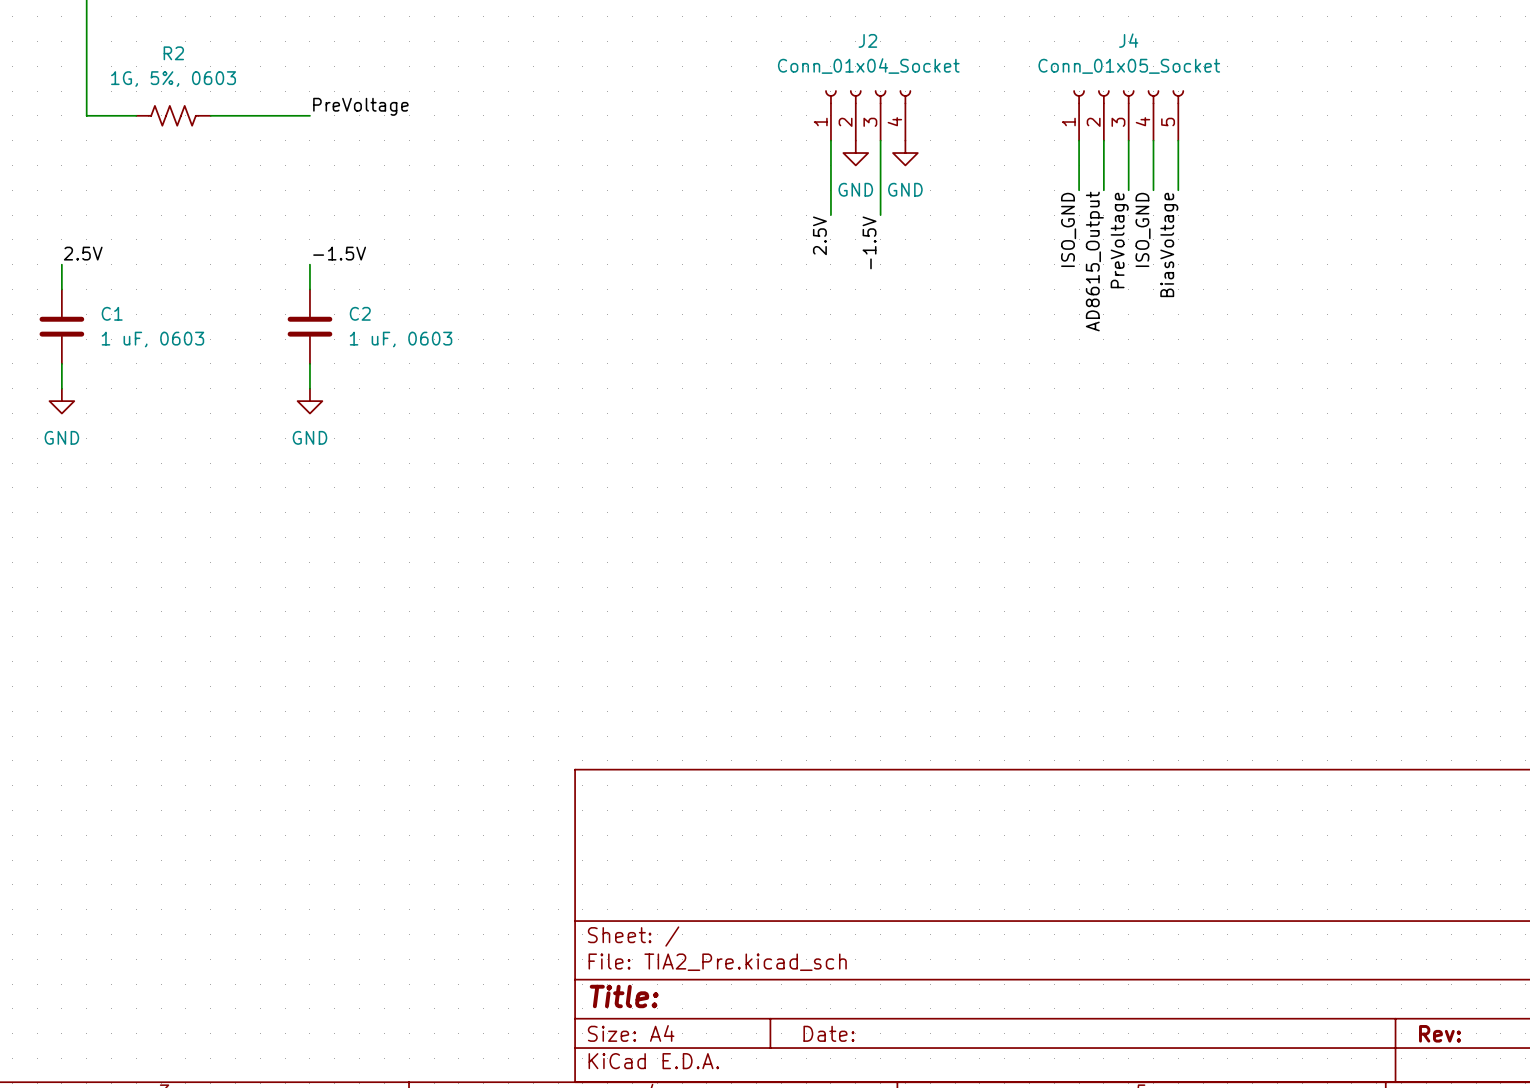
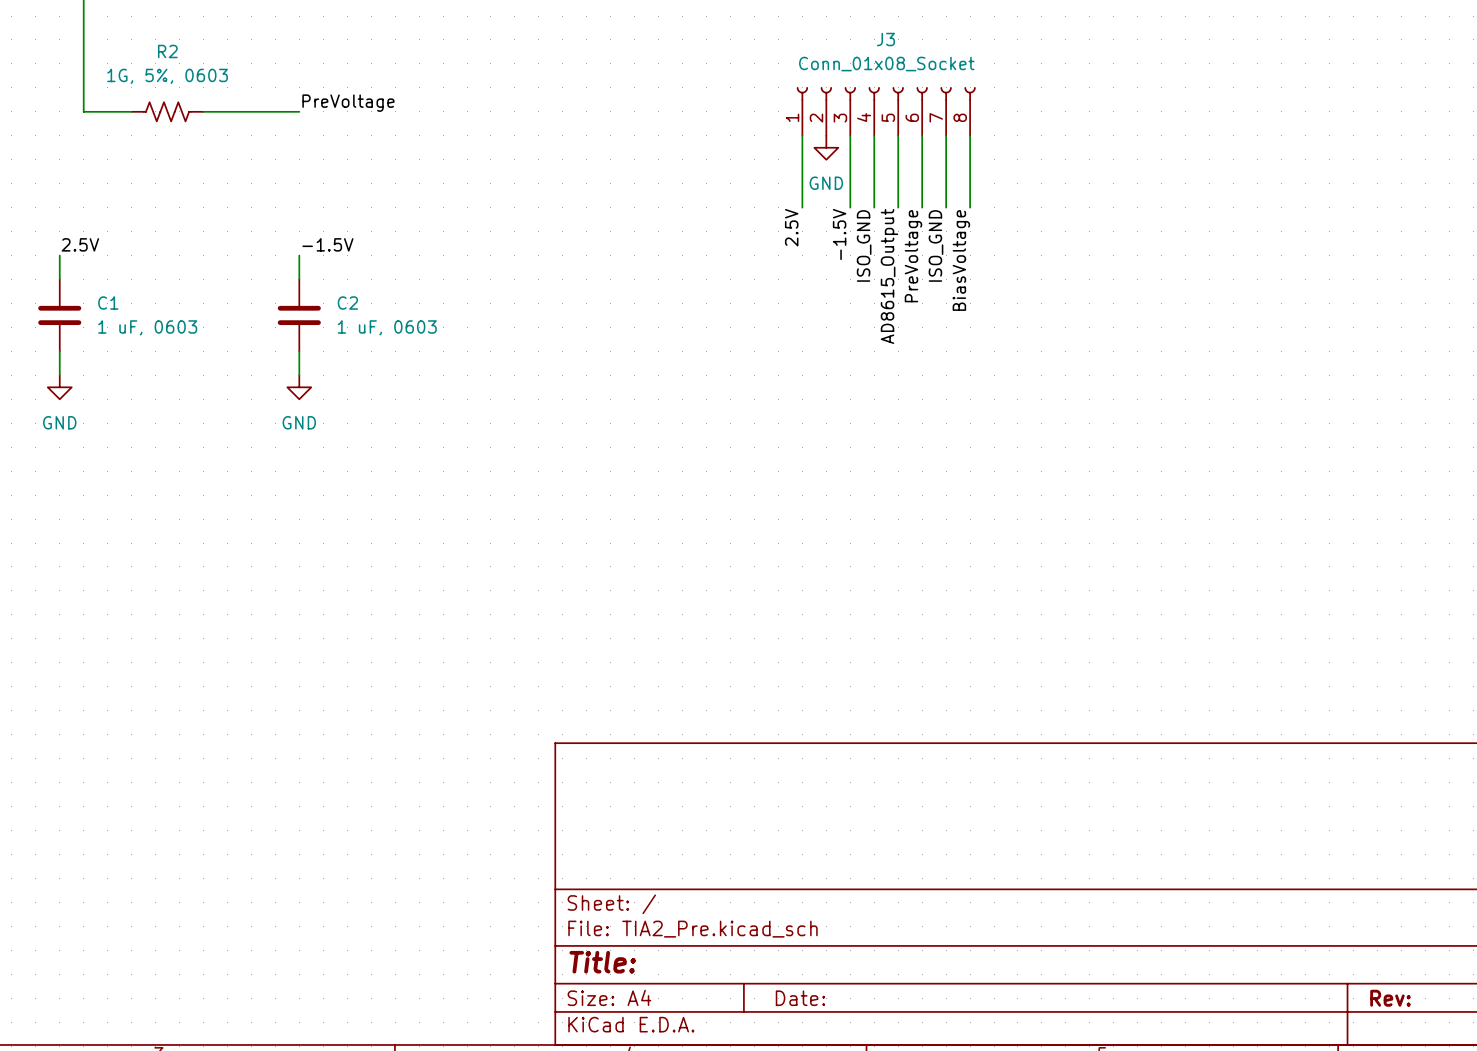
J2: Conn_01x04_Socket (868, 115) -> none
J3: none -> Conn_01x08_Socket (886, 111)
J4: Conn_01x05_Socket (1128, 115) -> none
wire: none -> (874, 135) (874, 207)
wire: none -> (898, 135) (898, 207)
wire: none -> (922, 135) (922, 207)
wire: none -> (946, 135) (946, 207)
wire: none -> (970, 135) (970, 207)
wire: (1079, 140) (1079, 190) -> none
wire: (1103, 140) (1103, 190) -> none
wire: (1128, 140) (1128, 190) -> none
wire: (1153, 140) (1153, 190) -> none
wire: (1178, 140) (1178, 190) -> none
power symbol: GND (905, 153) -> none
label: ISO_GND (1068, 229) -> none
label: ISO_GND (1143, 229) -> none
label position: PreVoltage (1119, 240) -> PreVoltage (913, 256)
label position: BiasVoltage (1169, 244) -> BiasVoltage (961, 260)
label: none -> ISO_GND (864, 245)
label: none -> ISO_GND (936, 245)
label position: AD8615_Output (1094, 261) -> AD8615_Output (889, 276)

